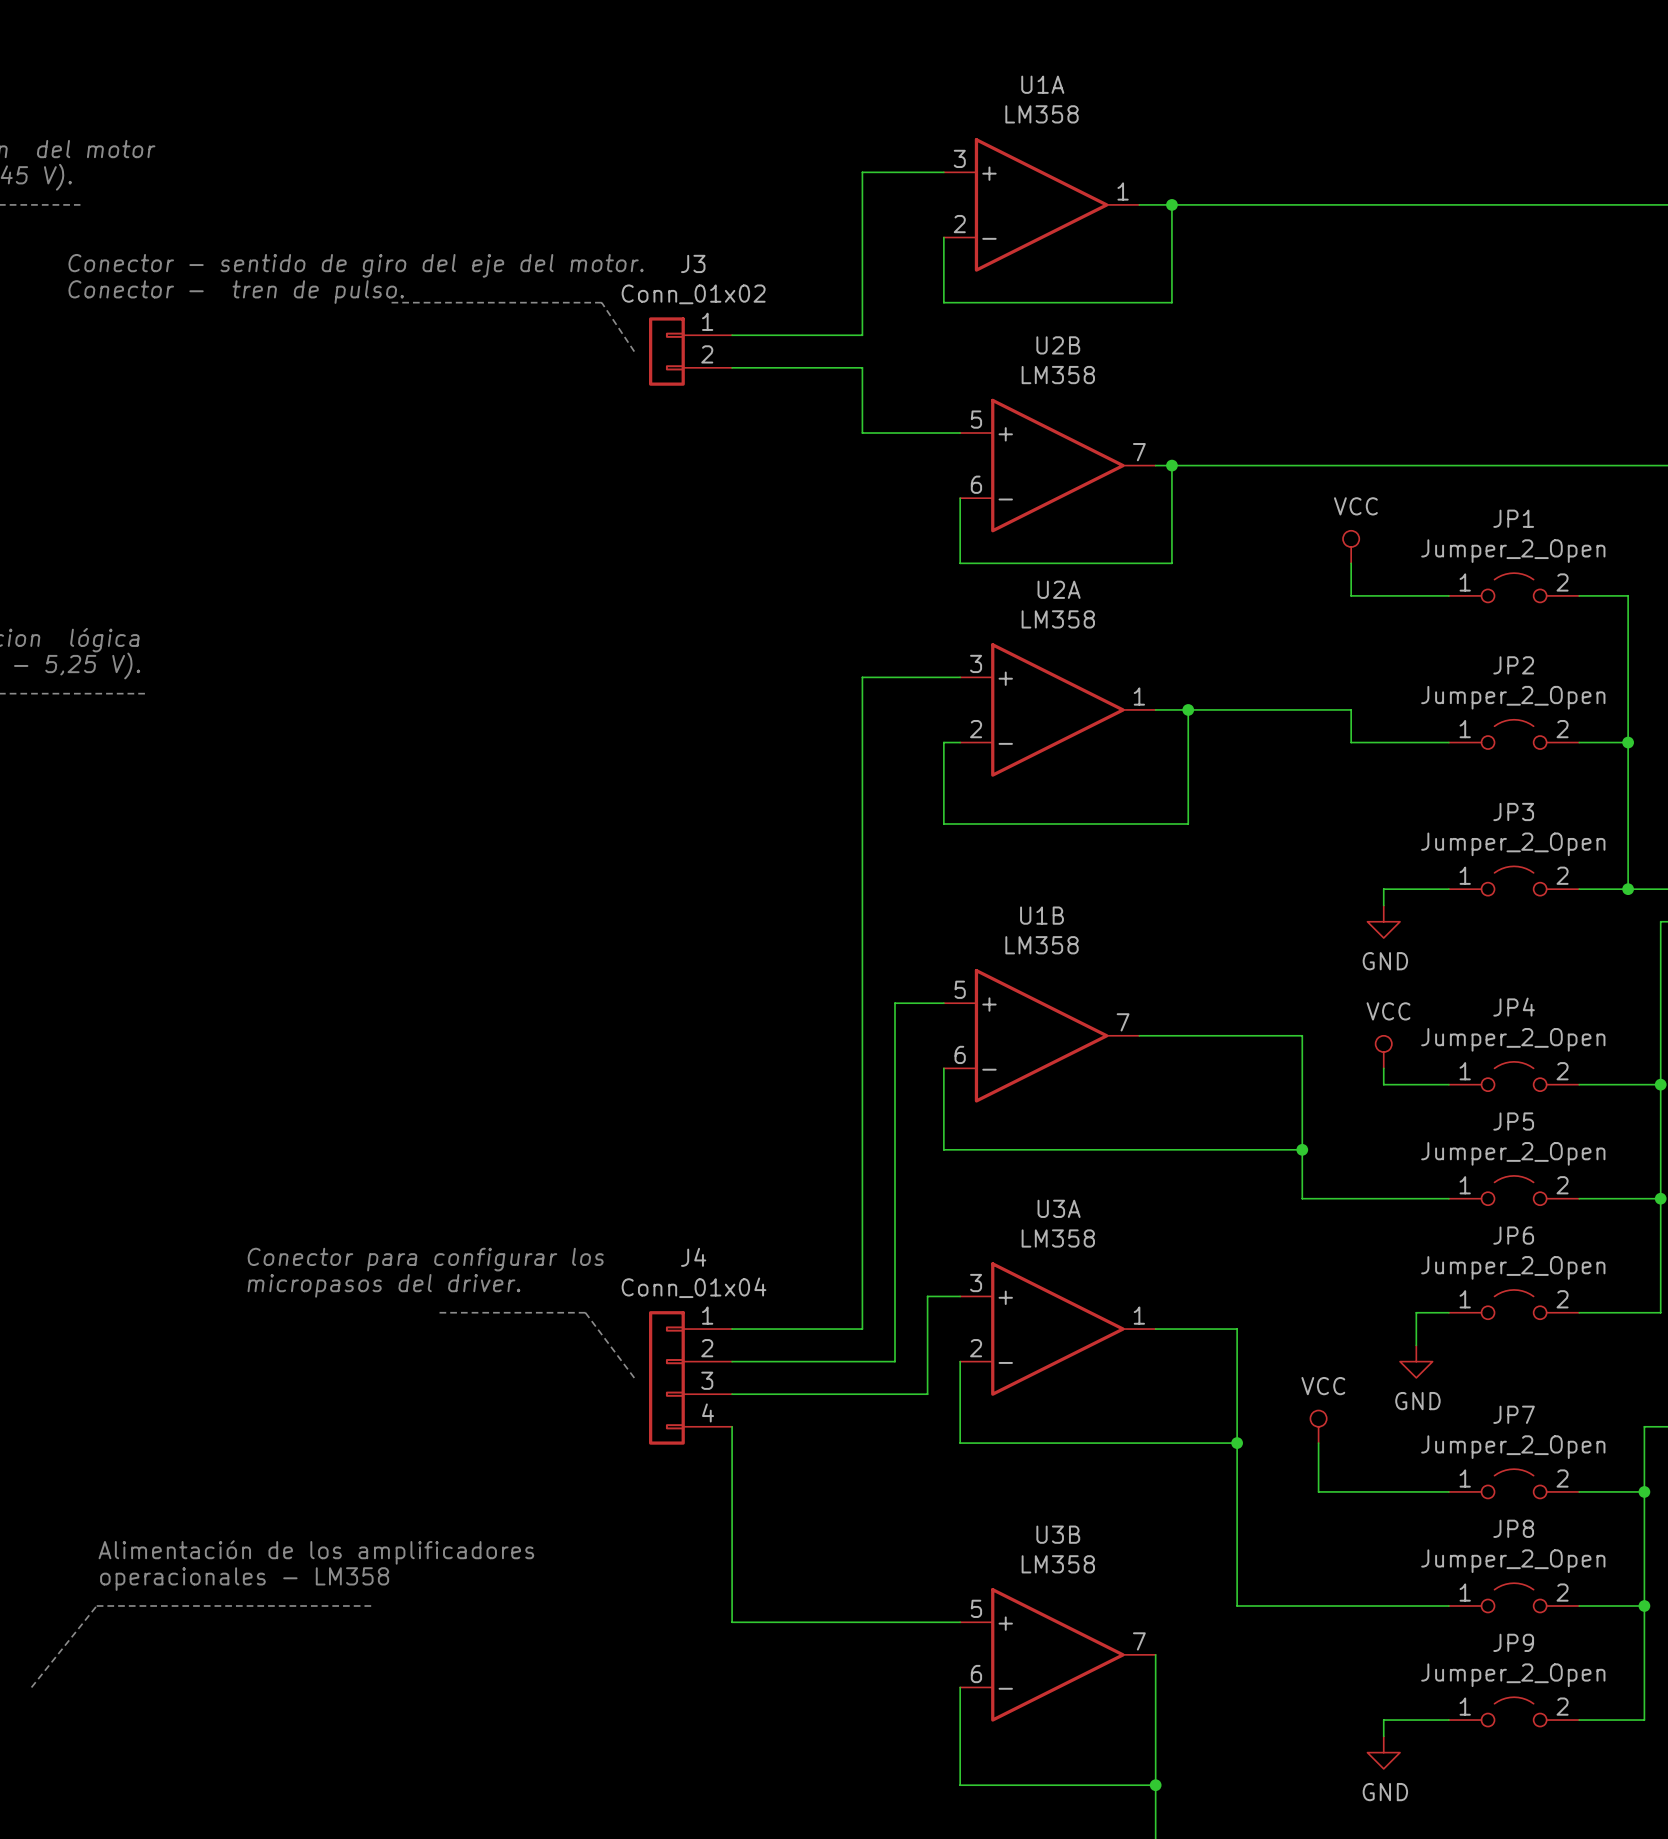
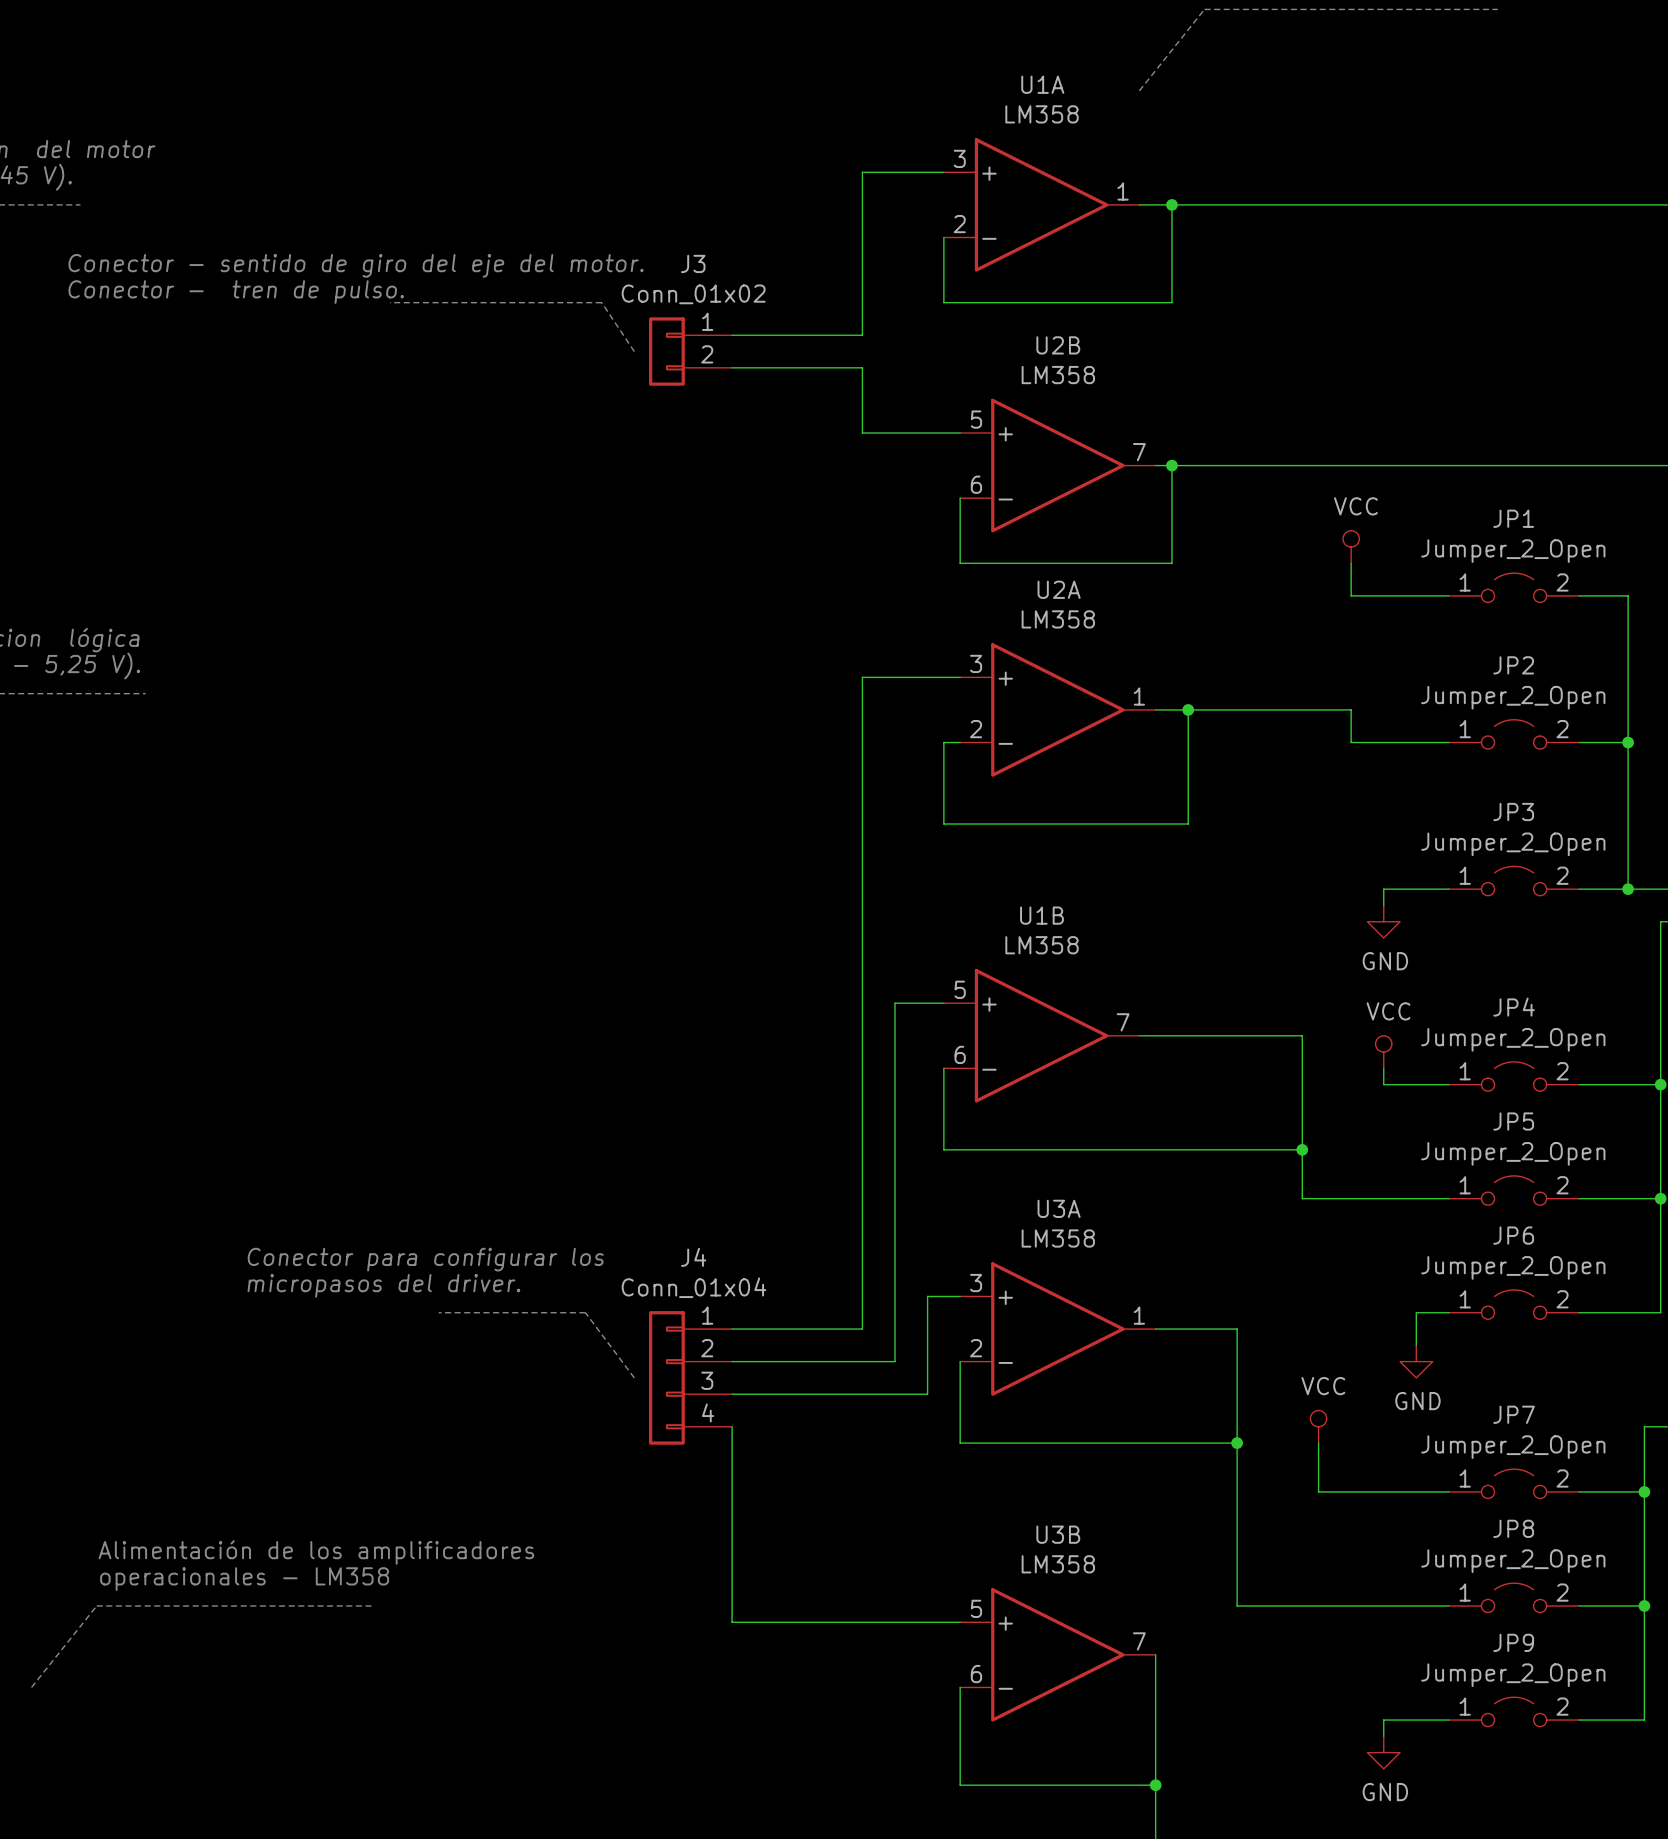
line: none -> (1497, 9) (1204, 9) (1139, 90)

